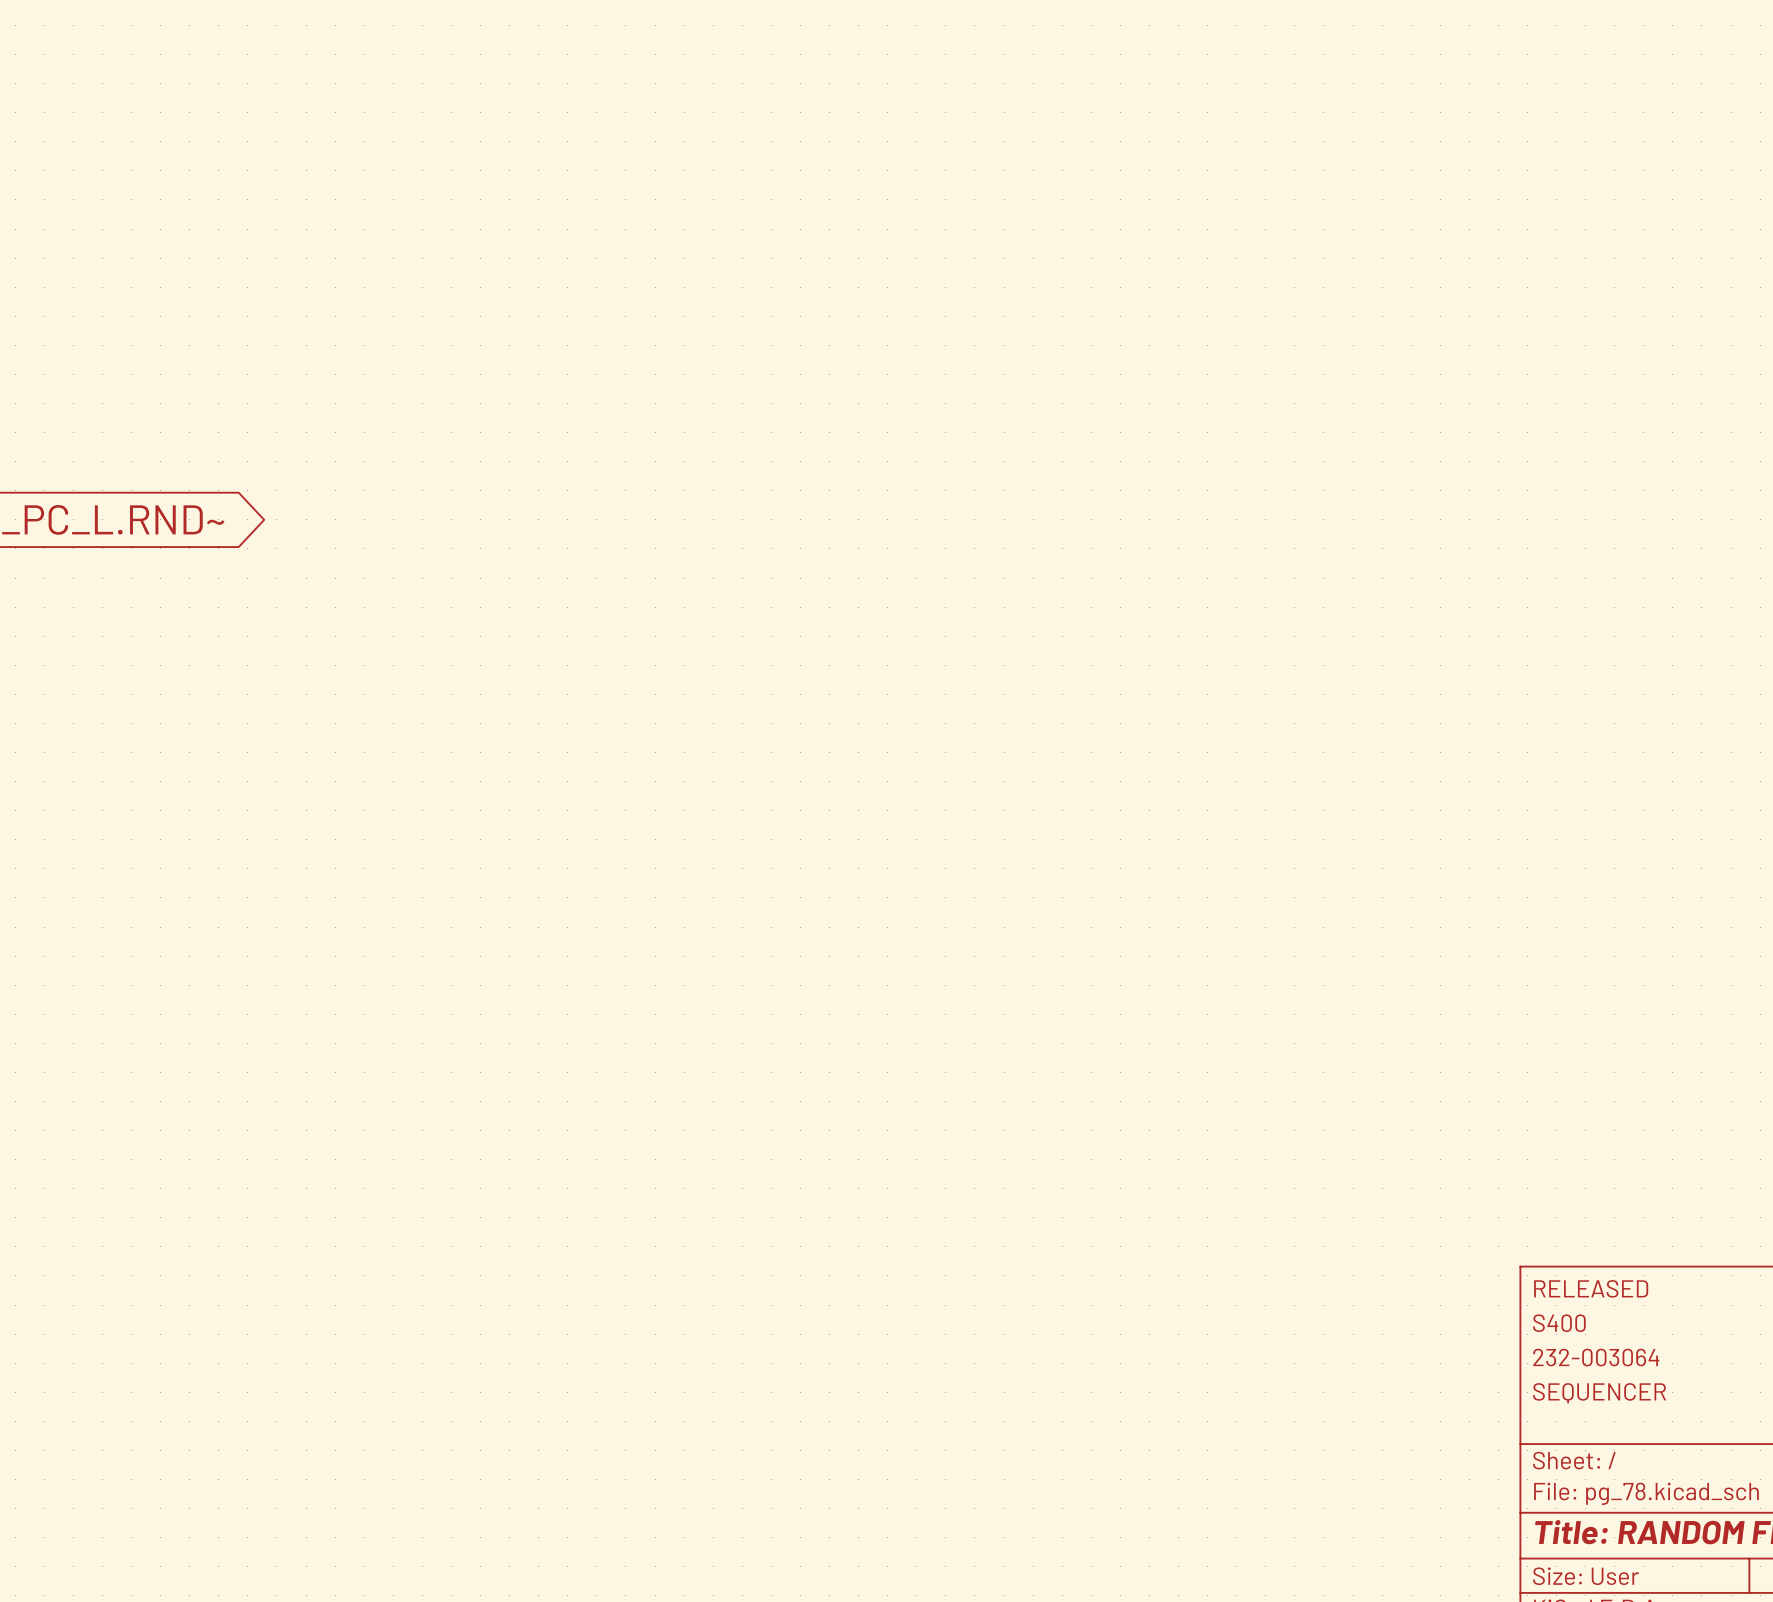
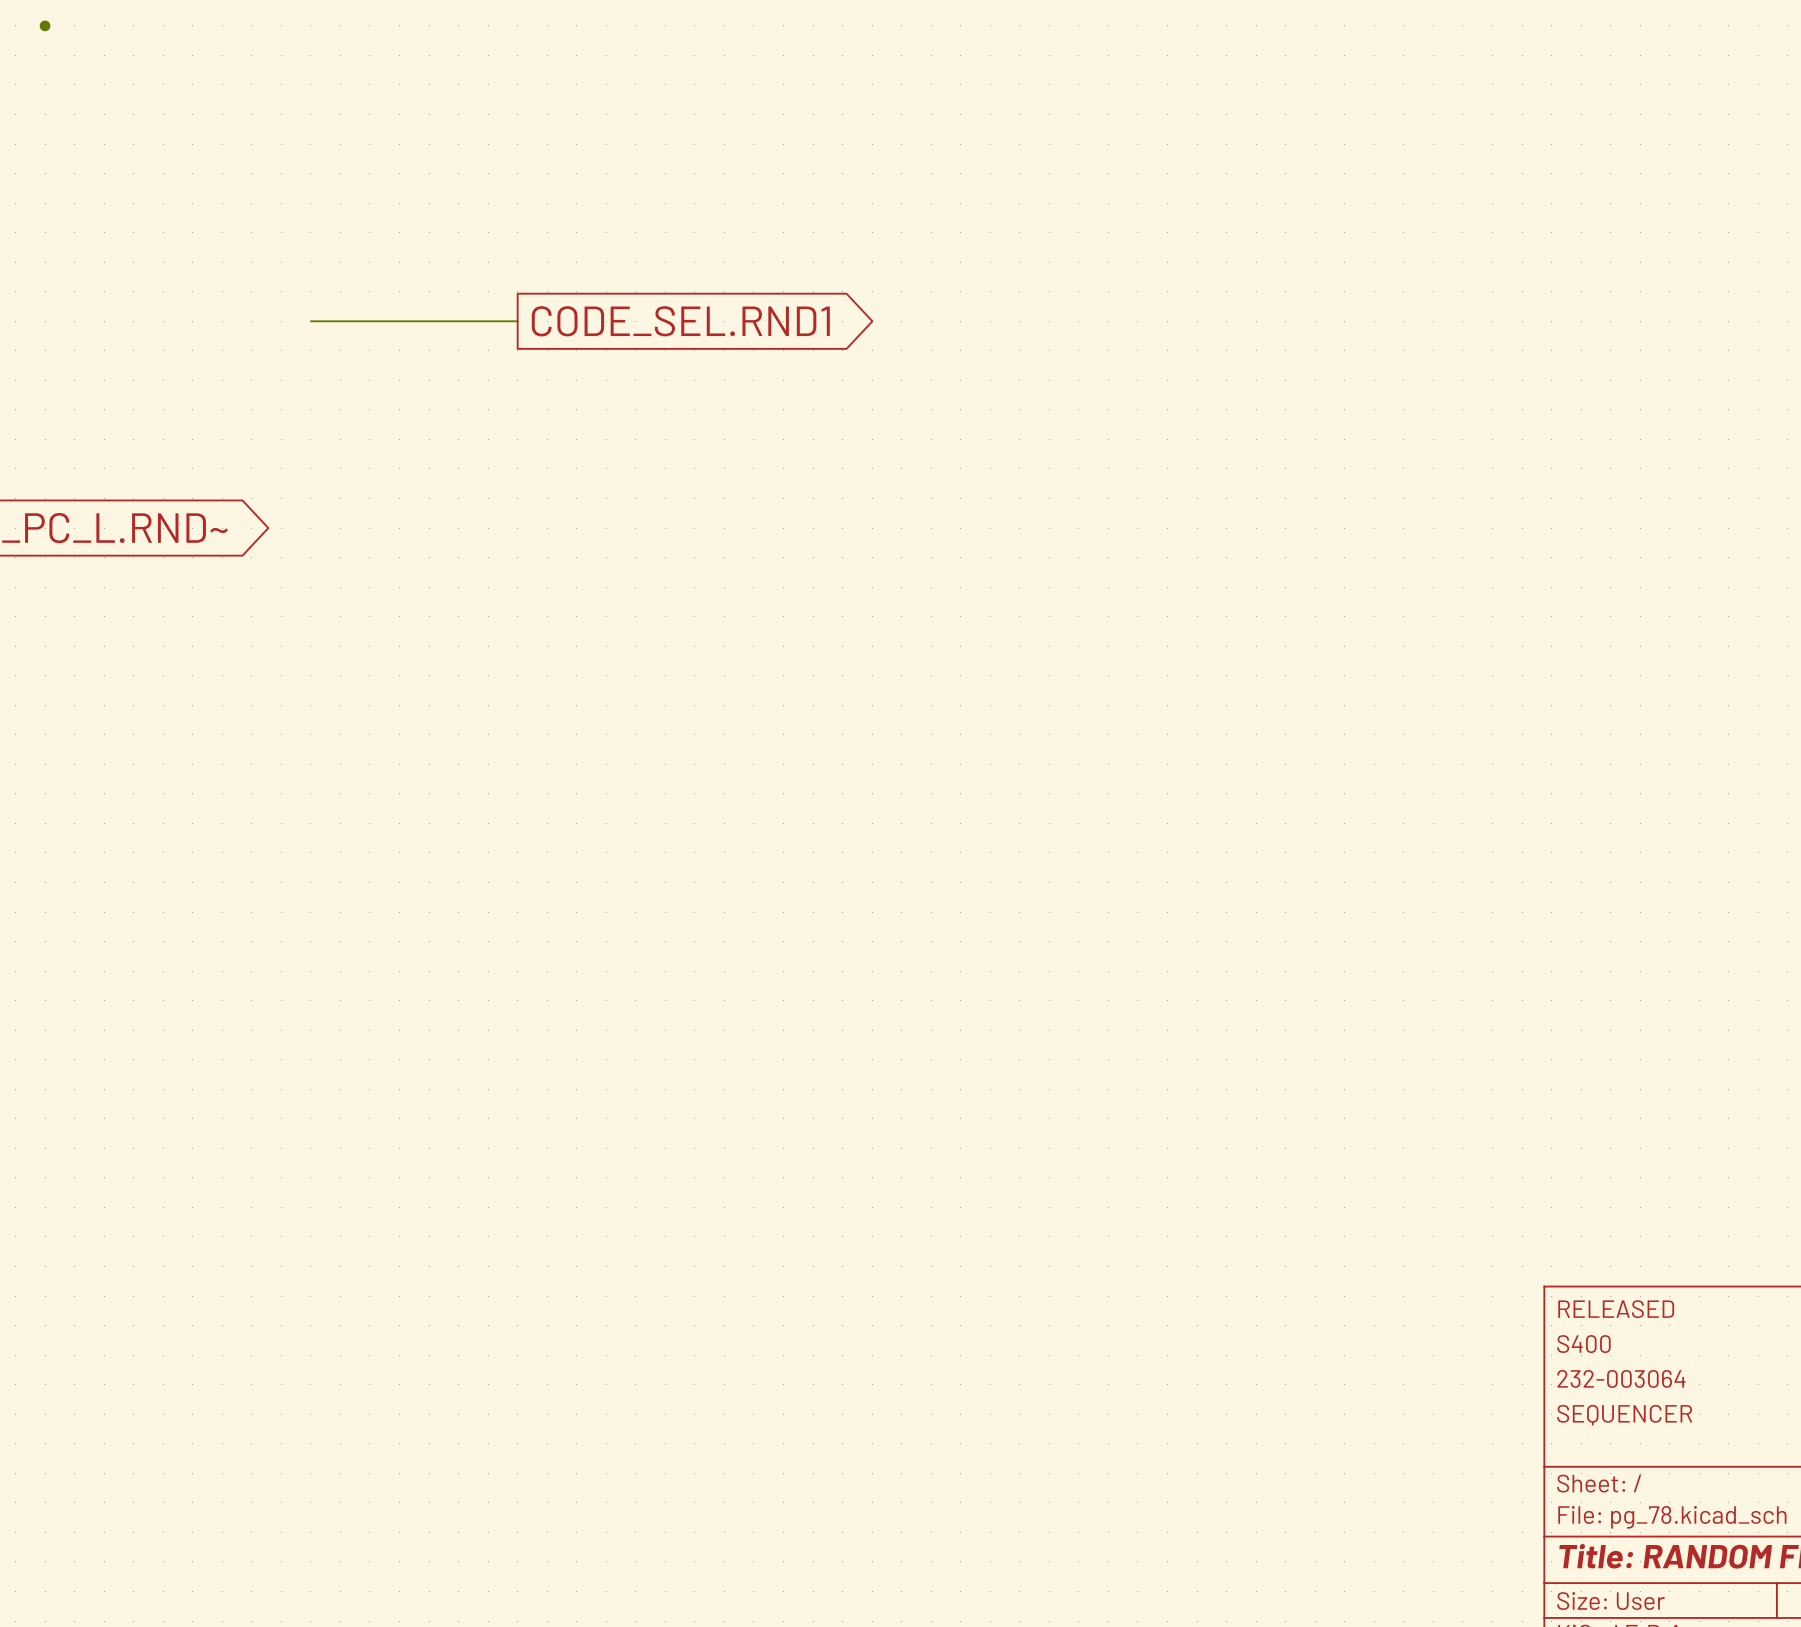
junction: none -> (45, 25)
wire: none -> (310, 321) (517, 321)
global label: none -> CODE_SEL.RND1 (680, 321)

